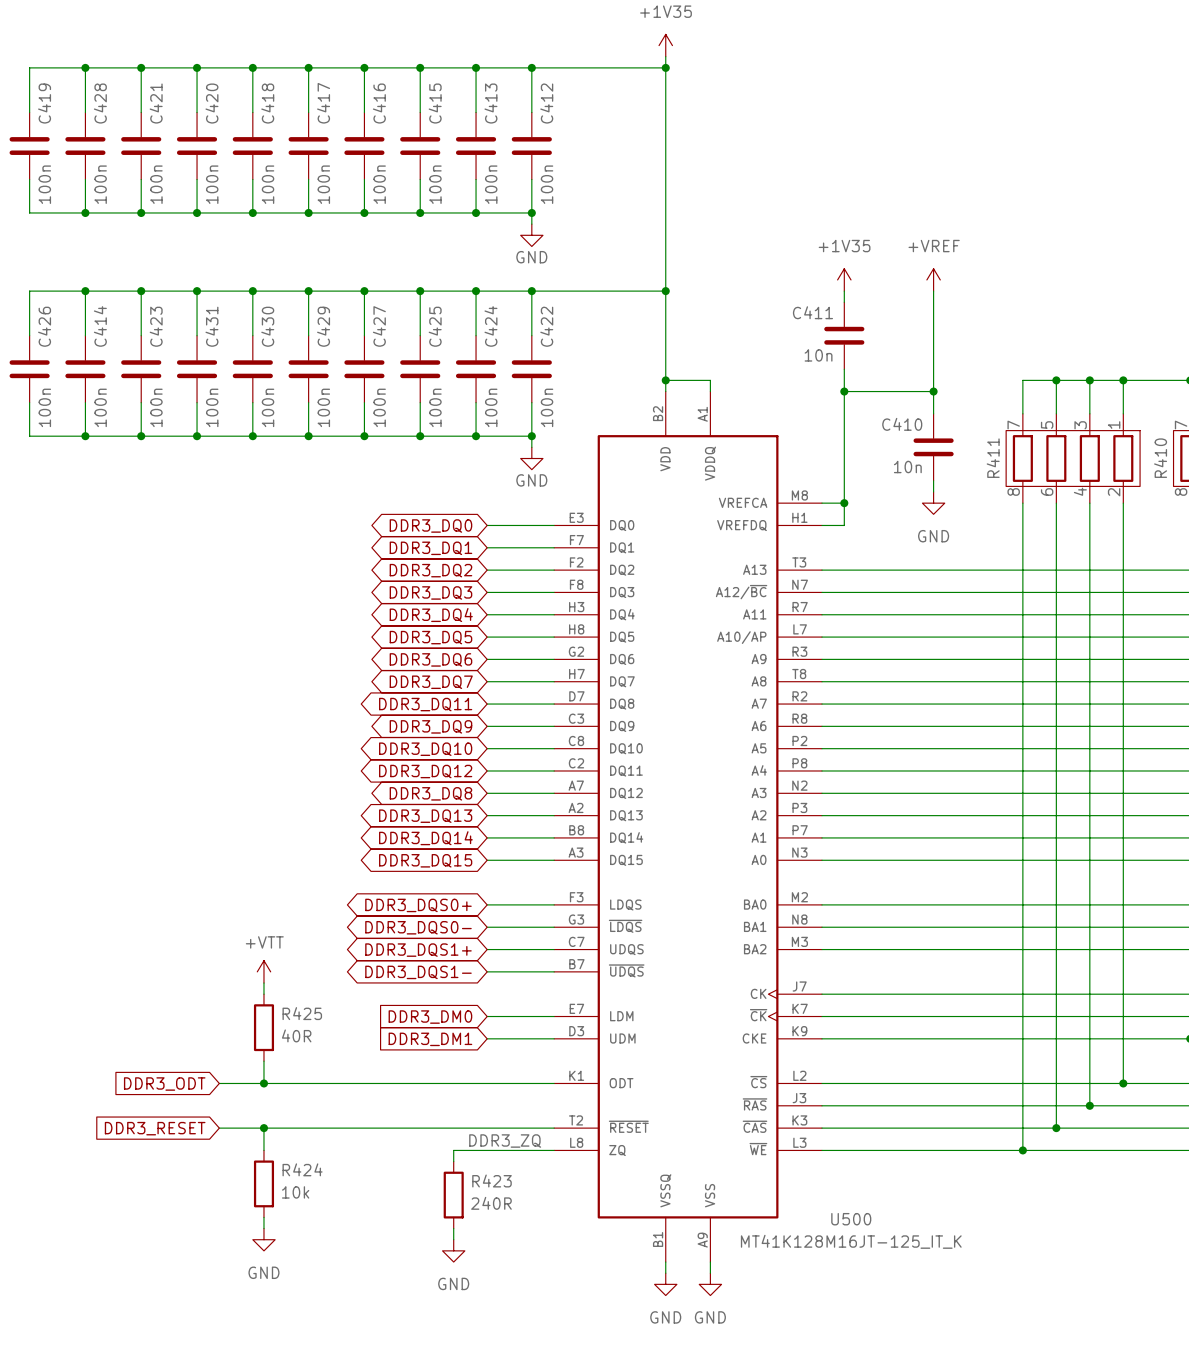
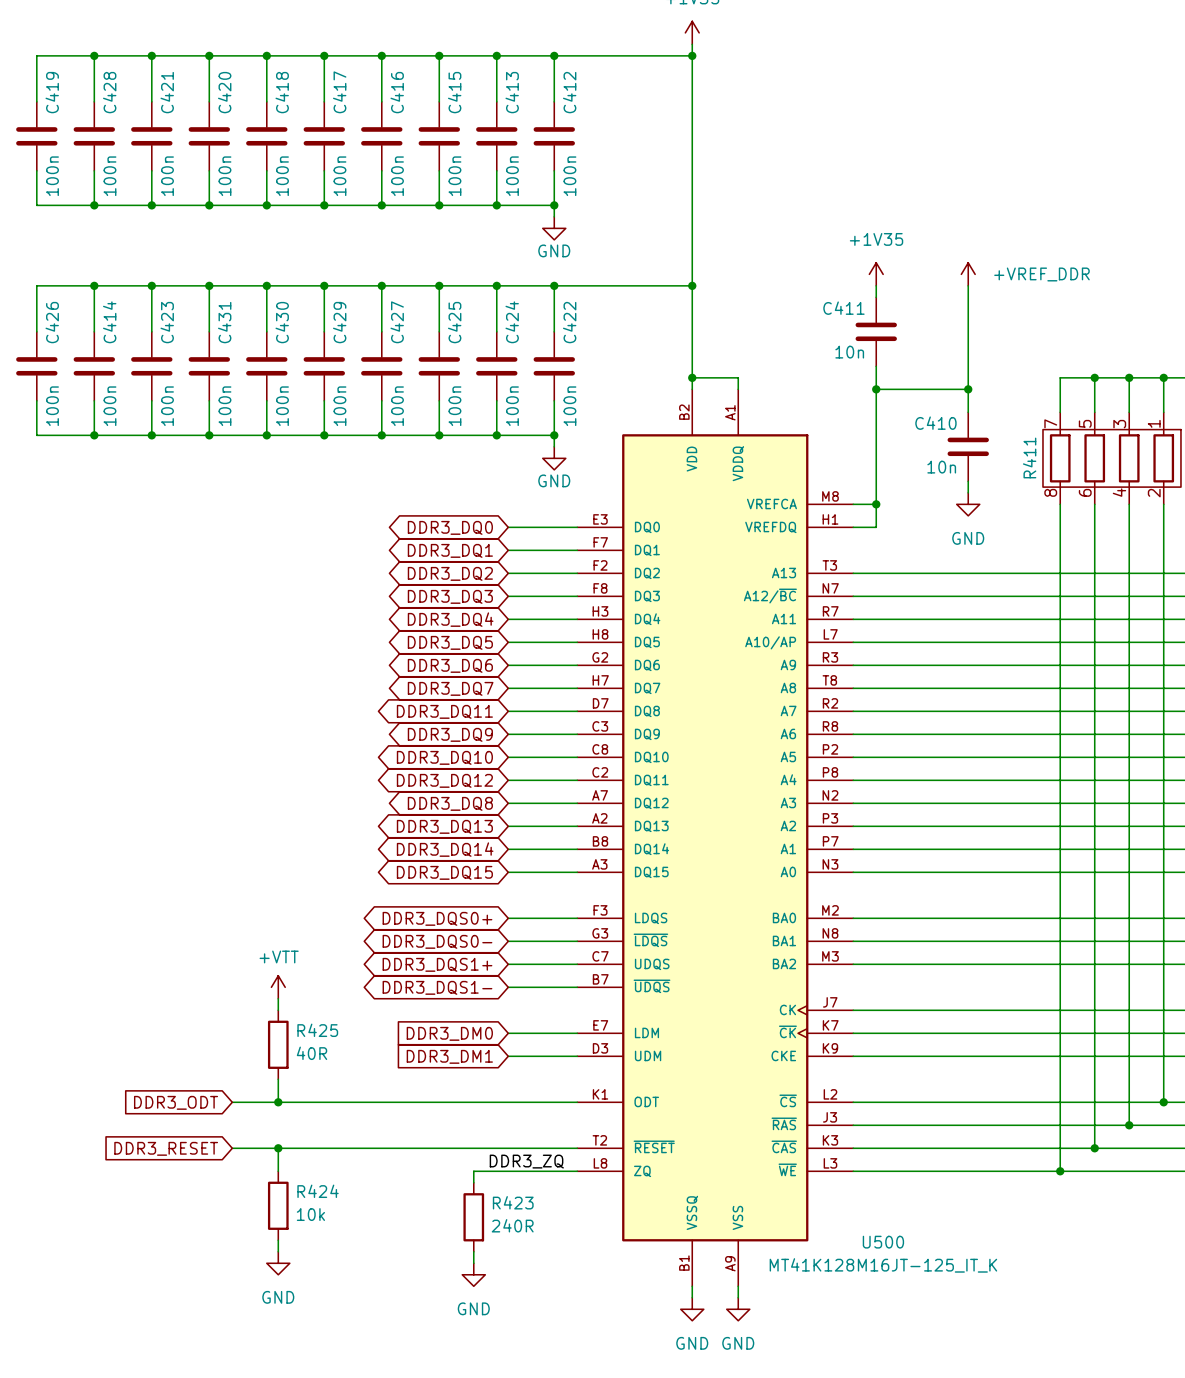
power symbol: +VREF (933, 279) -> +VREF_DDR (968, 274)

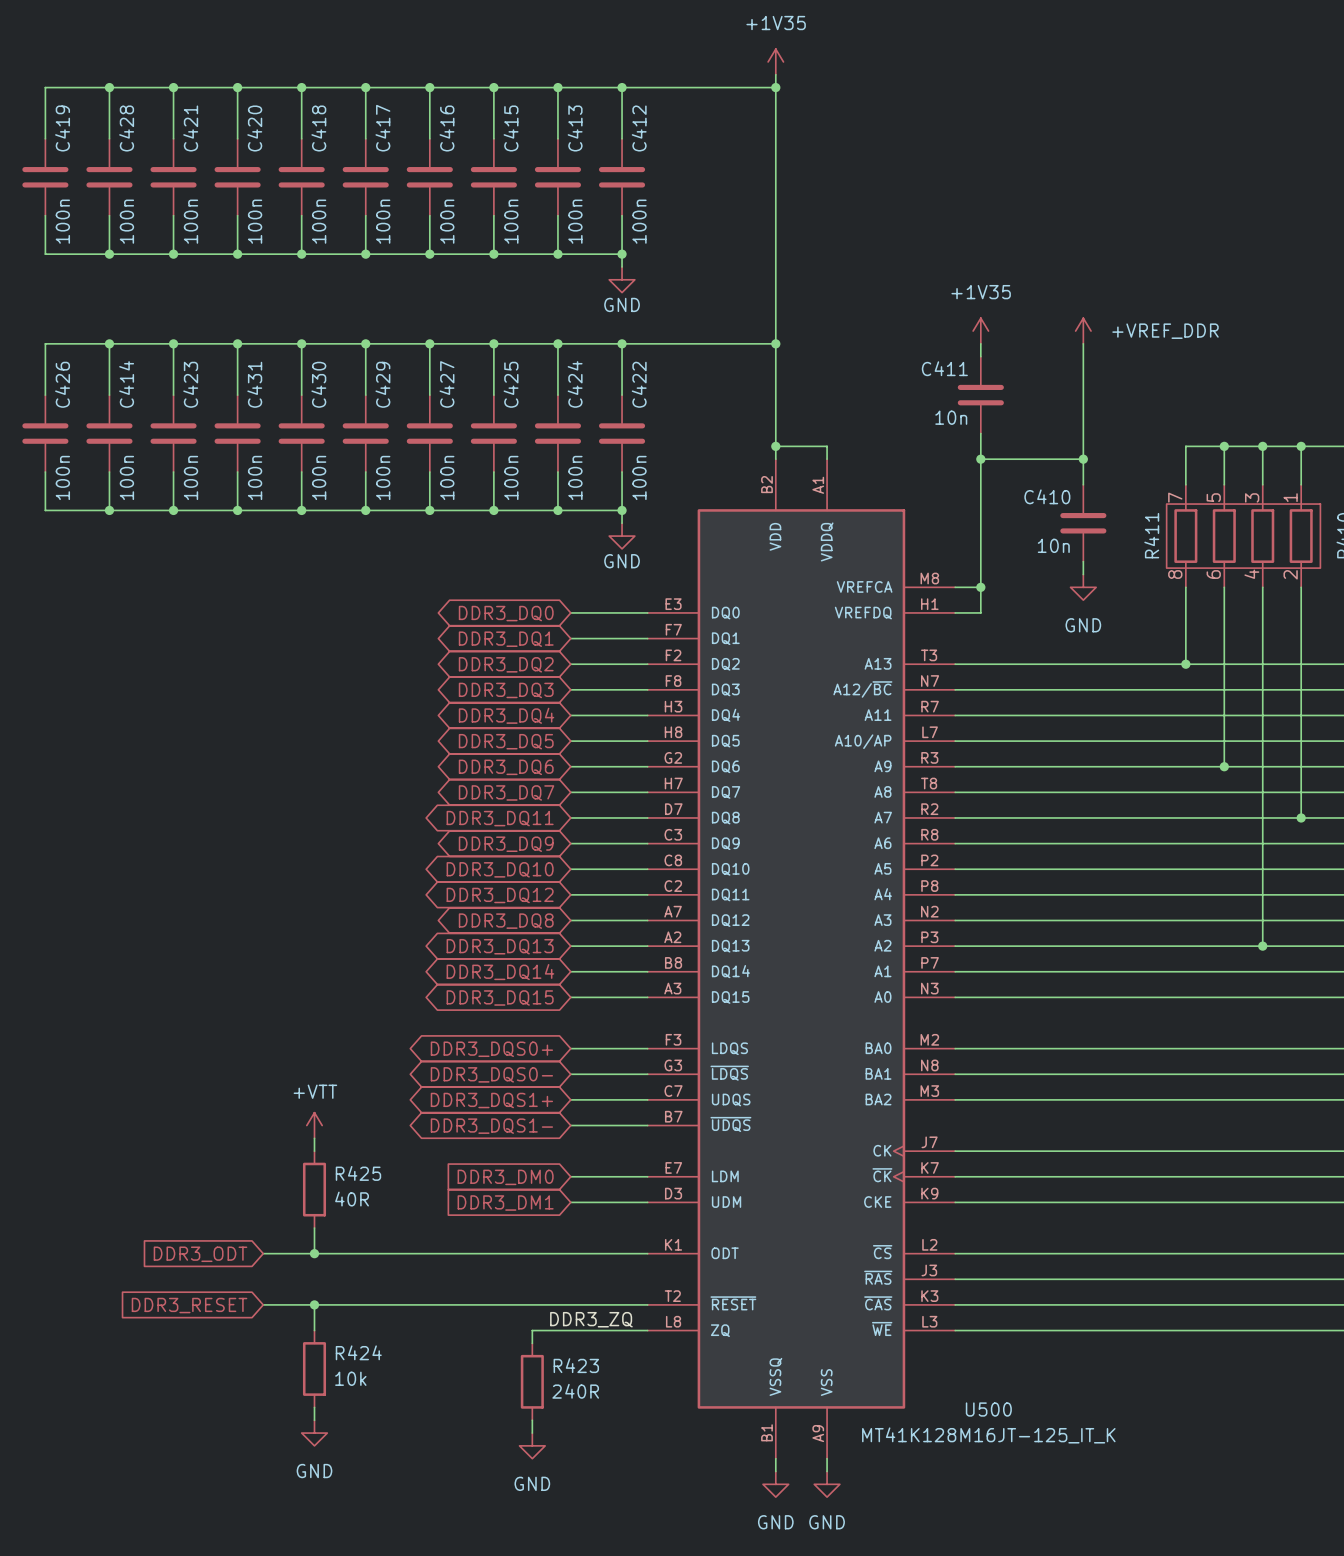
wire: (1060, 573) (1060, 1171) -> none
junction: none -> (1185, 664)
wire: (1094, 665) (1094, 1148) -> none
junction: none -> (1224, 766)
wire: (1163, 711) (1163, 1102) -> none
junction: none -> (1301, 817)
wire: (1129, 826) (1129, 1125) -> none
junction: none -> (1262, 946)
junction: (1163, 1102) -> none
junction: (1129, 1125) -> none
junction: (1094, 1148) -> none
junction: (1060, 1171) -> none

